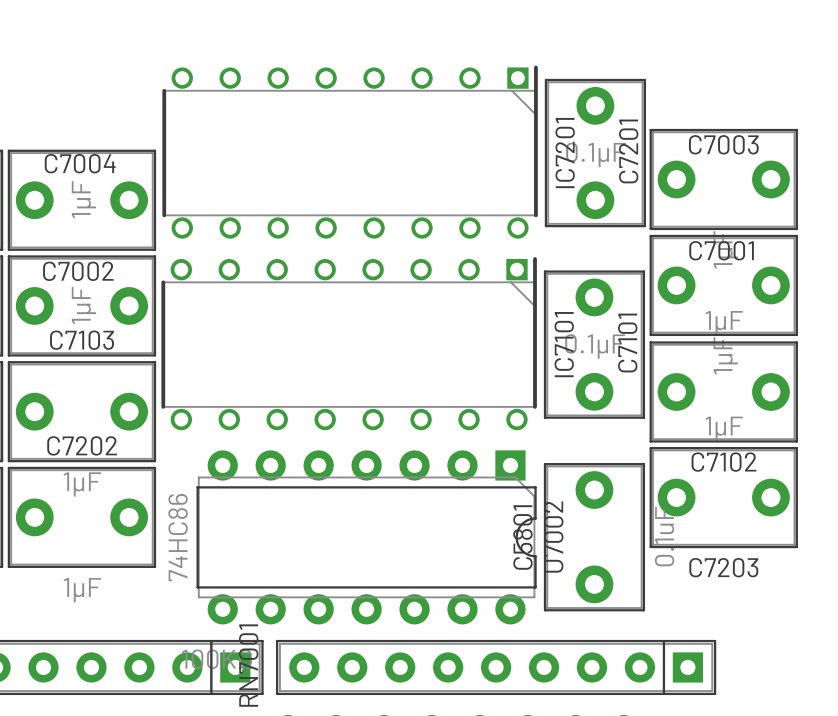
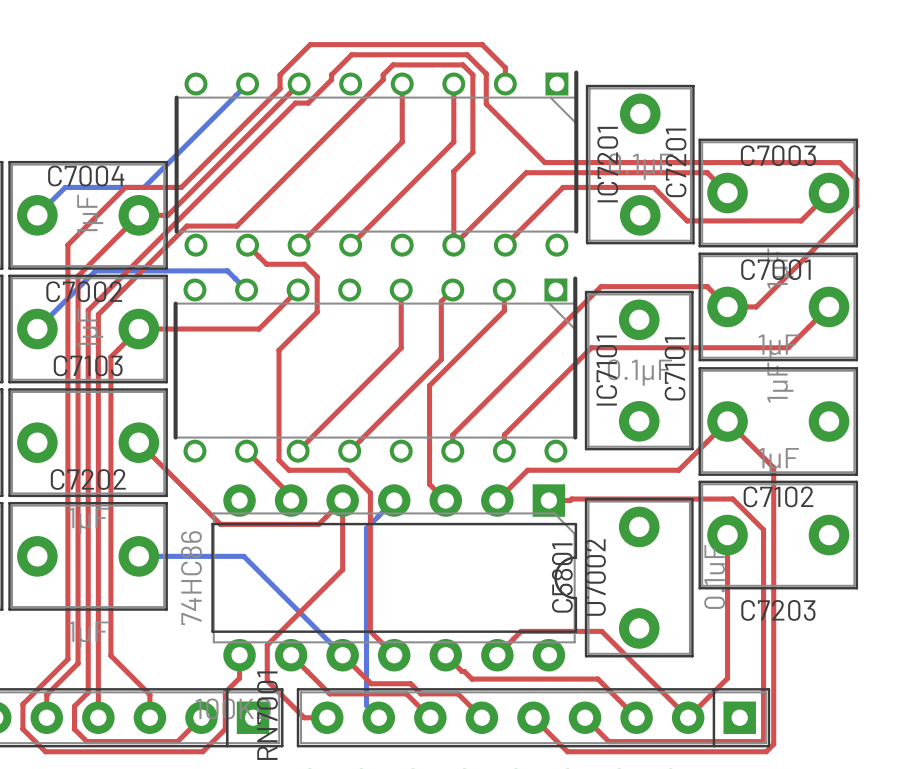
bottom track: none -> (247, 84) (144, 187) (65, 187) (37, 215)
top track: none -> (299, 84) (167, 215) (138, 215) (78, 276) (78, 663) (46, 694) (46, 717)
top track: none -> (402, 84) (402, 142) (299, 245)
top track: none -> (453, 84) (453, 142) (350, 245)
top track: none -> (505, 84) (505, 67) (482, 44) (310, 44) (280, 74) (280, 88) (181, 187) (125, 187) (67, 244) (67, 659) (22, 704) (22, 729) (45, 751) (202, 751) (225, 729) (225, 692) (239, 678) (239, 655)
top track: none -> (727, 193) (707, 172) (526, 172) (453, 245) (453, 171) (472, 152) (472, 74) (462, 64) (393, 64) (383, 74) (383, 79) (236, 226) (186, 226) (98, 314) (98, 717)
top track: none -> (829, 193) (801, 220) (687, 220) (653, 187) (563, 187) (505, 245)
top track: none -> (247, 245) (266, 264) (304, 264) (317, 276) (317, 312) (279, 350) (279, 460) (288, 470) (347, 470) (370, 492) (370, 631) (394, 655)
bottom track: none -> (246, 289) (227, 270) (95, 270) (37, 329)
top track: none -> (298, 289) (259, 329) (138, 329) (110, 356) (110, 655) (149, 694) (149, 717)
top track: none -> (401, 289) (401, 348) (298, 451)
top track: none -> (452, 289) (441, 301) (441, 359) (349, 451)
top track: none -> (504, 289) (504, 310) (429, 385) (429, 484) (445, 500)
top track: none -> (829, 306) (788, 347) (591, 347) (504, 434) (504, 451)
top track: none -> (138, 442) (220, 524) (318, 524) (342, 500) (342, 569) (267, 645) (267, 680) (304, 717) (327, 717)
top track: none -> (246, 451) (291, 495) (291, 500)
top track: none -> (452, 451) (452, 434) (601, 286) (707, 286) (727, 306) (756, 306) (856, 206) (856, 179) (839, 162) (544, 162) (486, 103) (486, 73) (467, 54) (351, 54) (331, 74) (331, 79) (308, 103) (295, 103) (88, 310) (88, 692) (74, 706) (74, 729) (86, 741) (177, 741) (201, 717)
bottom track: none -> (394, 500) (366, 528) (366, 705) (378, 717)
top track: none -> (497, 500) (527, 470) (678, 470) (727, 421) (773, 467) (773, 744) (766, 751) (567, 751) (533, 717)
top track: none -> (548, 500) (732, 499) (763, 529) (763, 740) (762, 741) (608, 741) (585, 717)
top track: none -> (727, 535) (727, 678) (688, 717) (601, 631) (521, 631) (497, 655)
bottom track: none -> (138, 556) (243, 556) (342, 655)
top track: none -> (291, 655) (329, 693) (406, 693) (430, 717)
top track: none -> (342, 655) (371, 683) (410, 683) (420, 693) (458, 693) (481, 717)
top track: none -> (445, 655) (471, 679) (597, 679) (636, 717)

